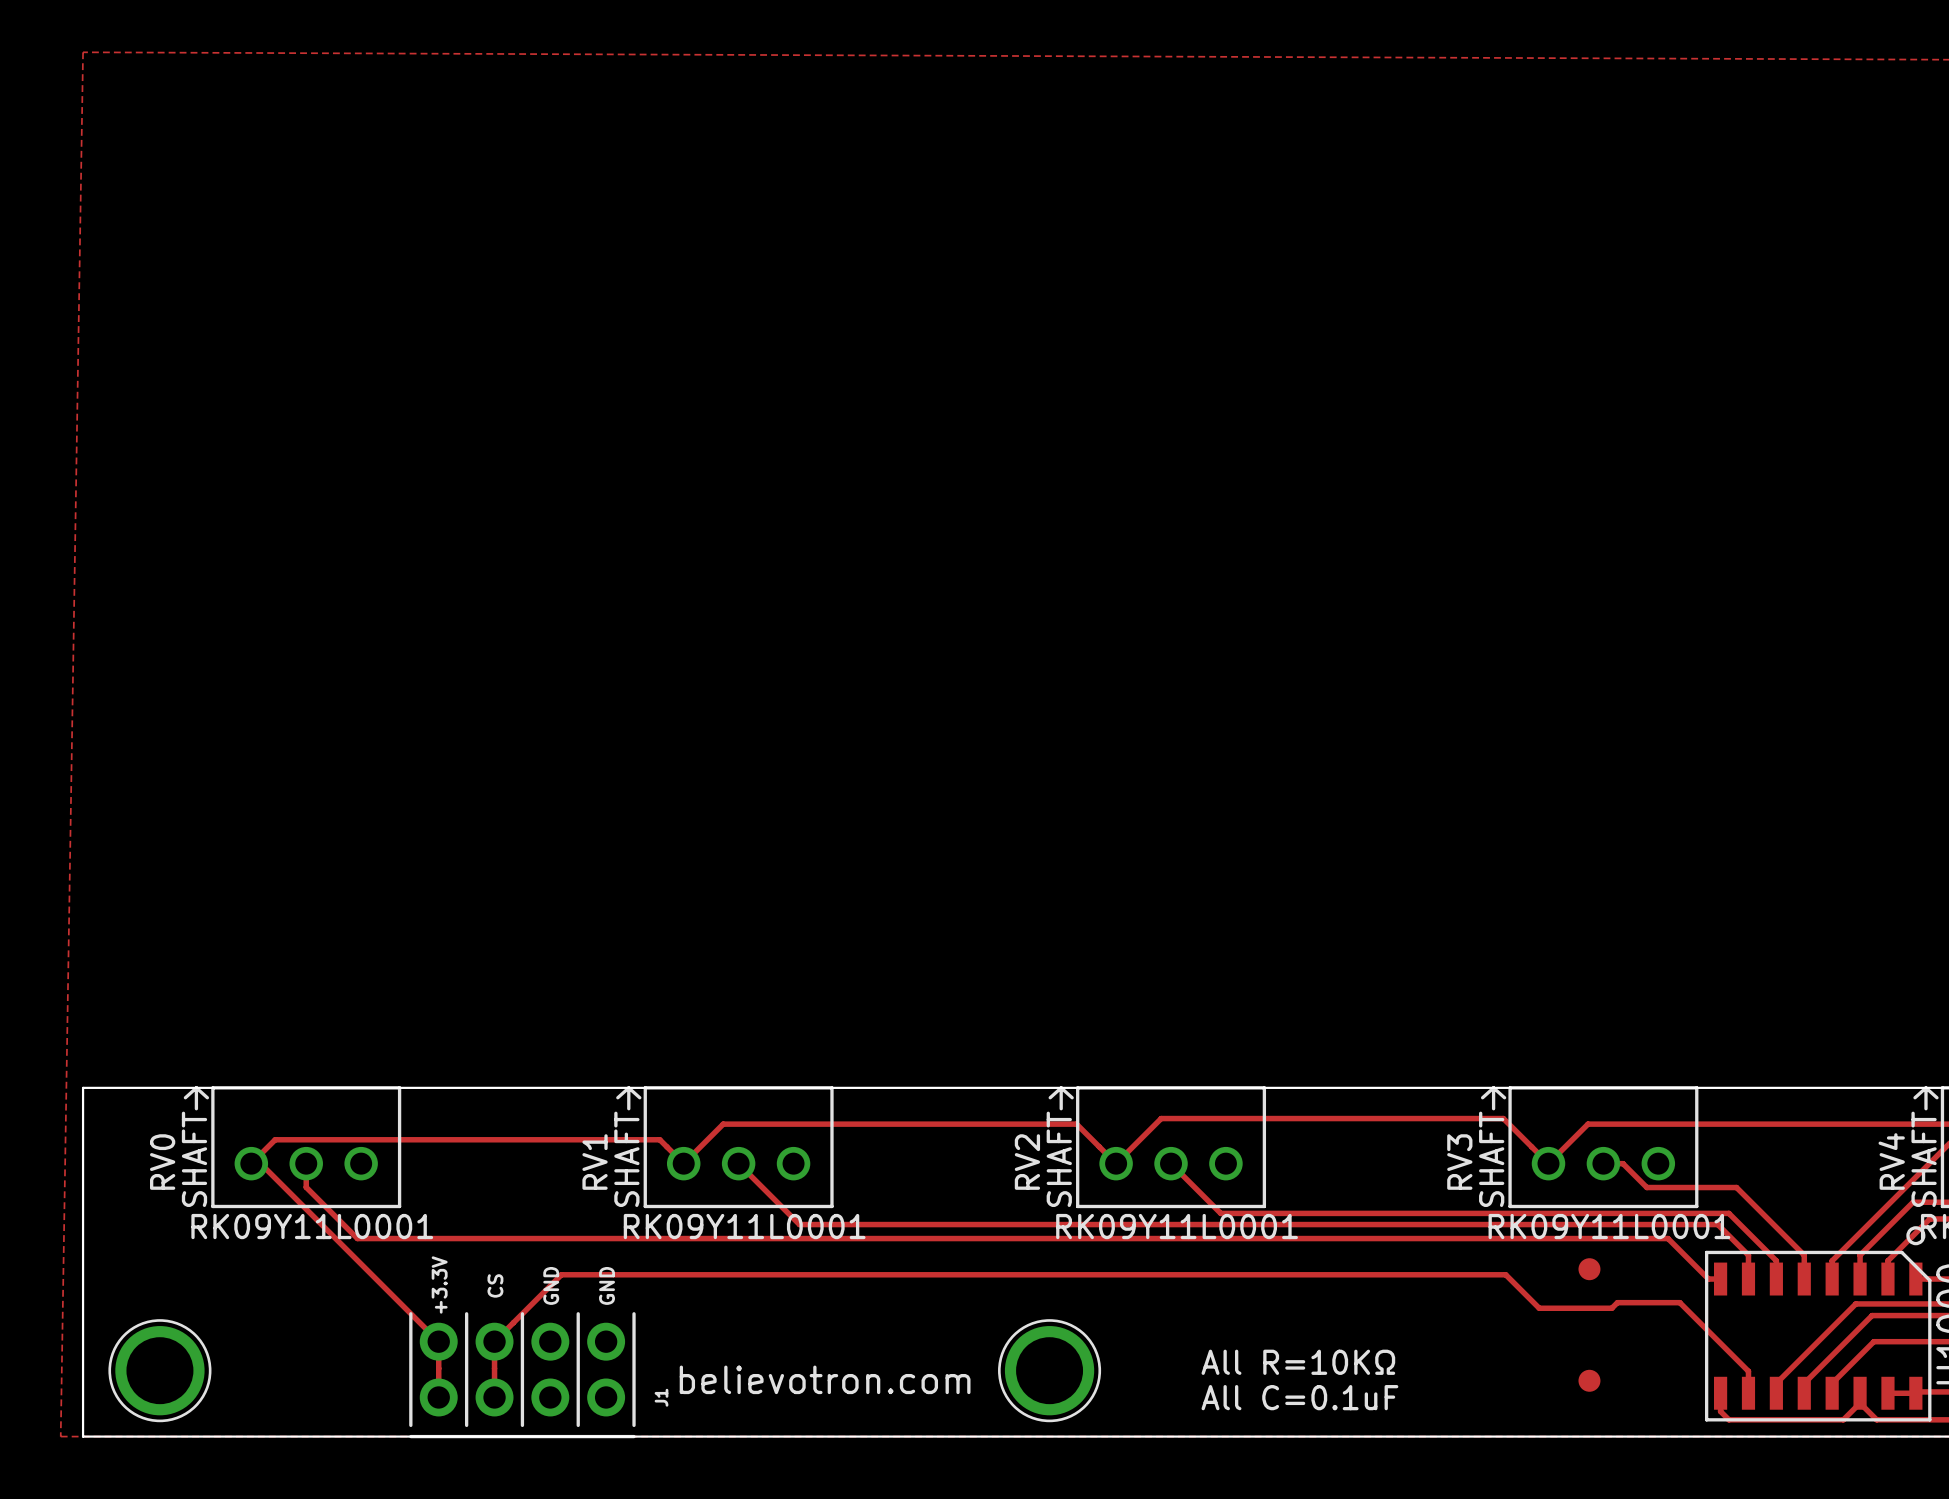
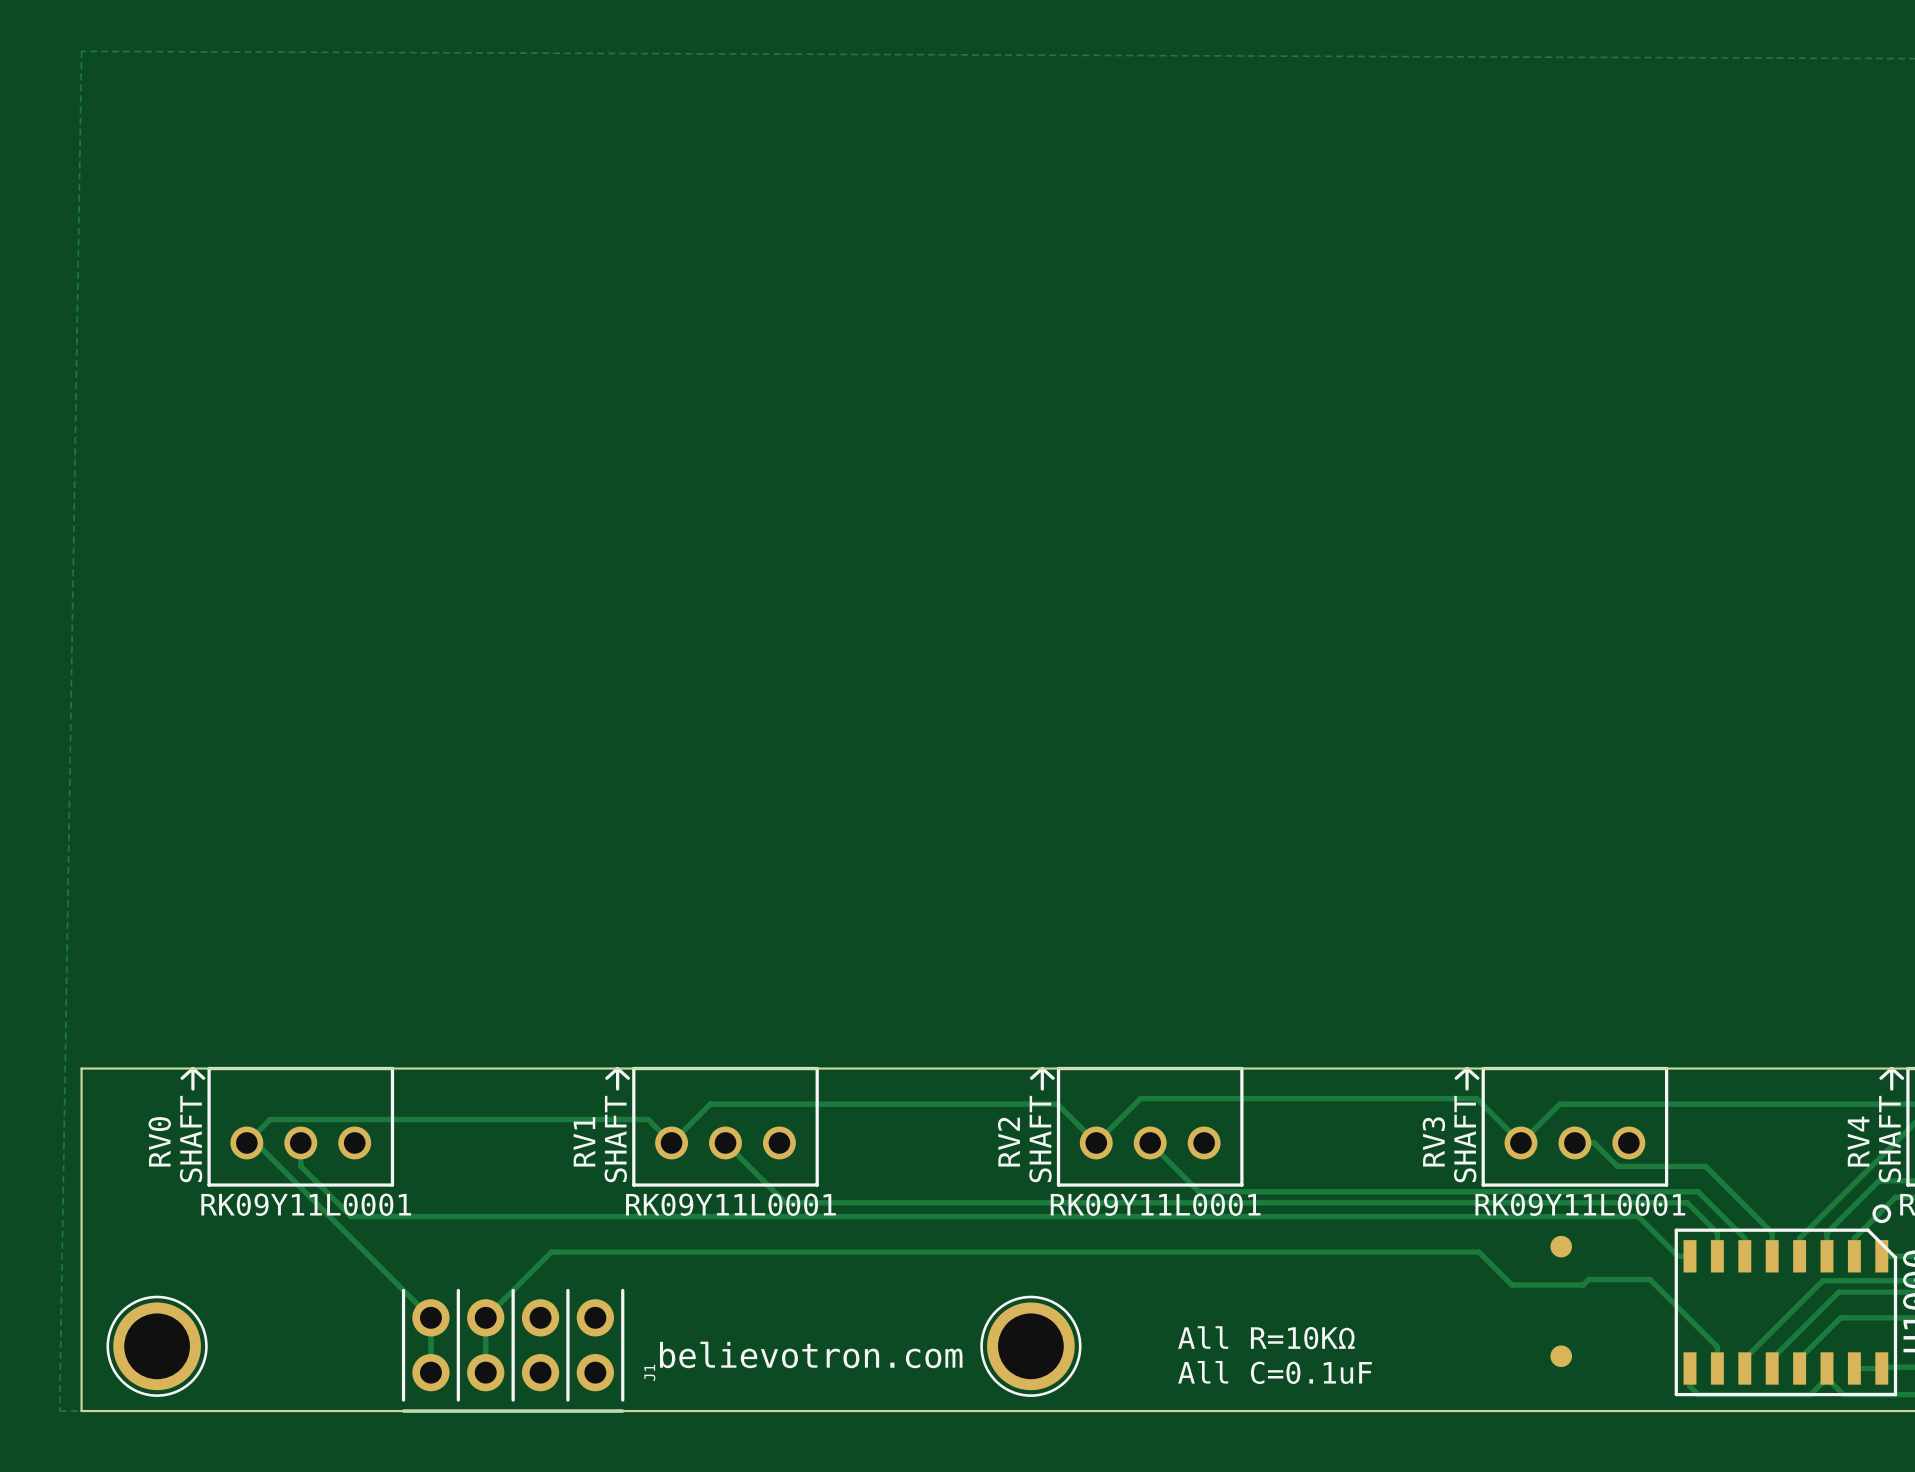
text: +3.3V (439, 1284) -> none
text: CS (495, 1285) -> none
text: GND (551, 1285) -> none
text: GND (607, 1285) -> none

